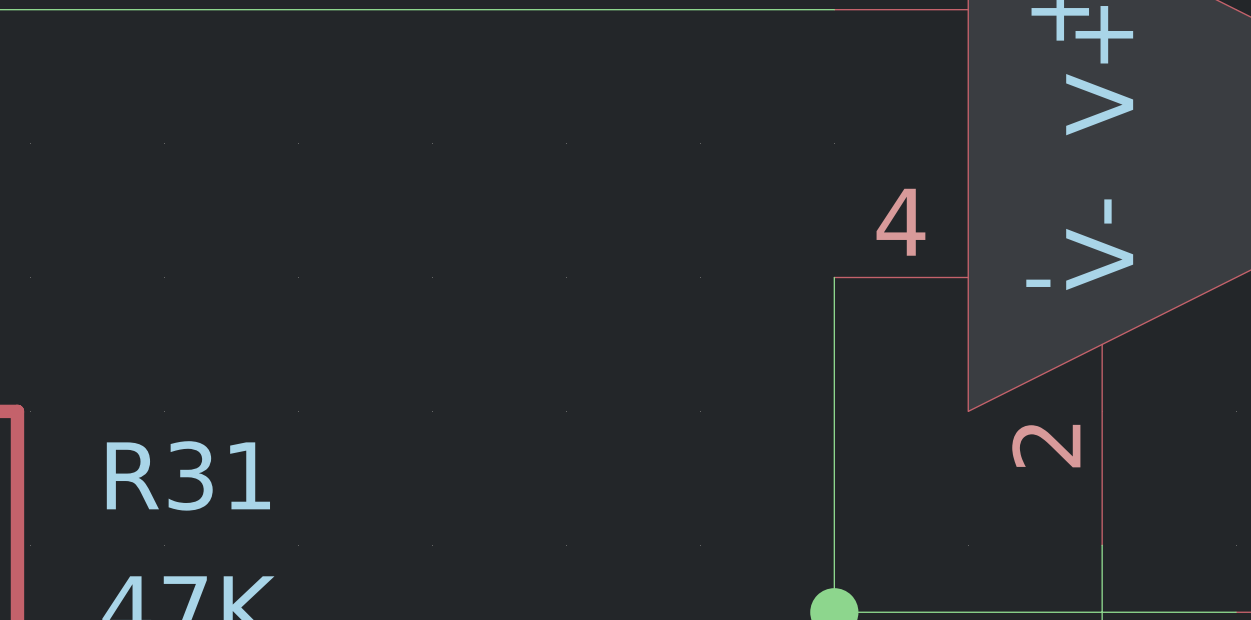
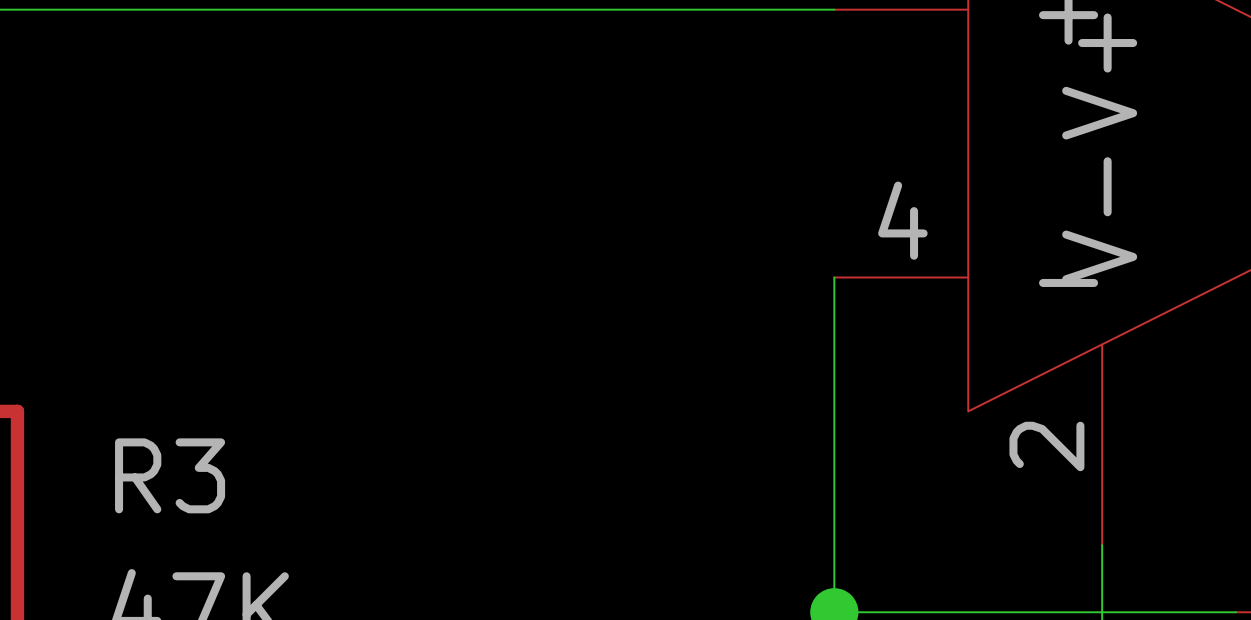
R31 name: R31 (188, 475) -> R3 (170, 475)

